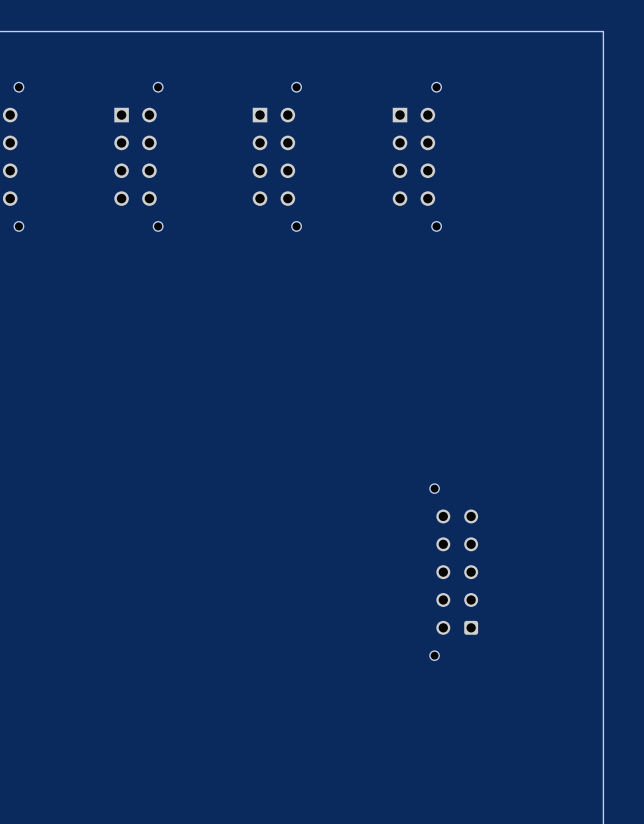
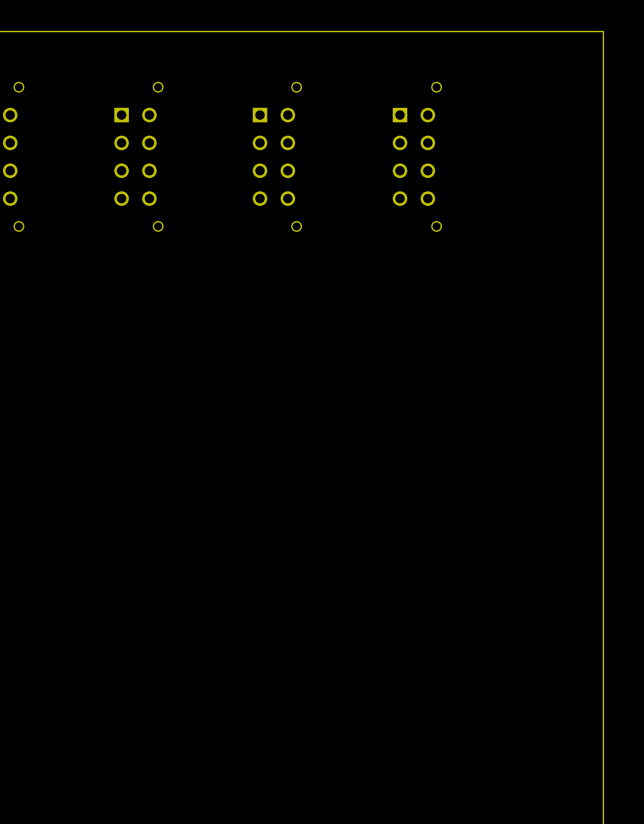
part: (454, 572) -> none

